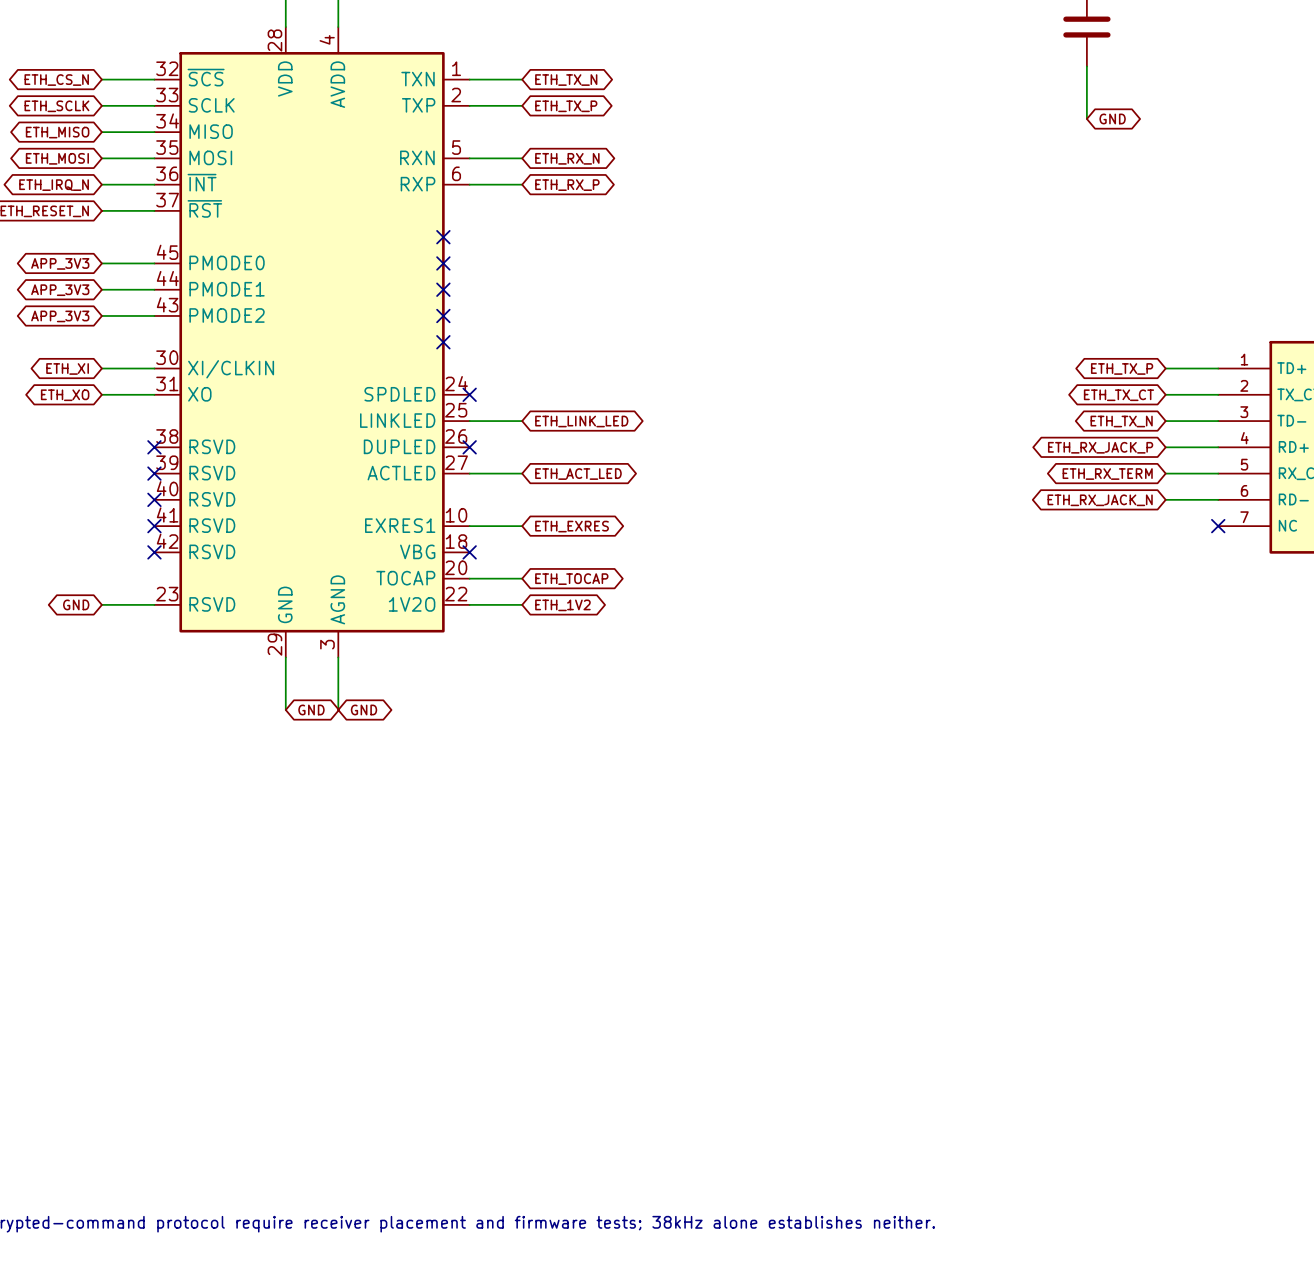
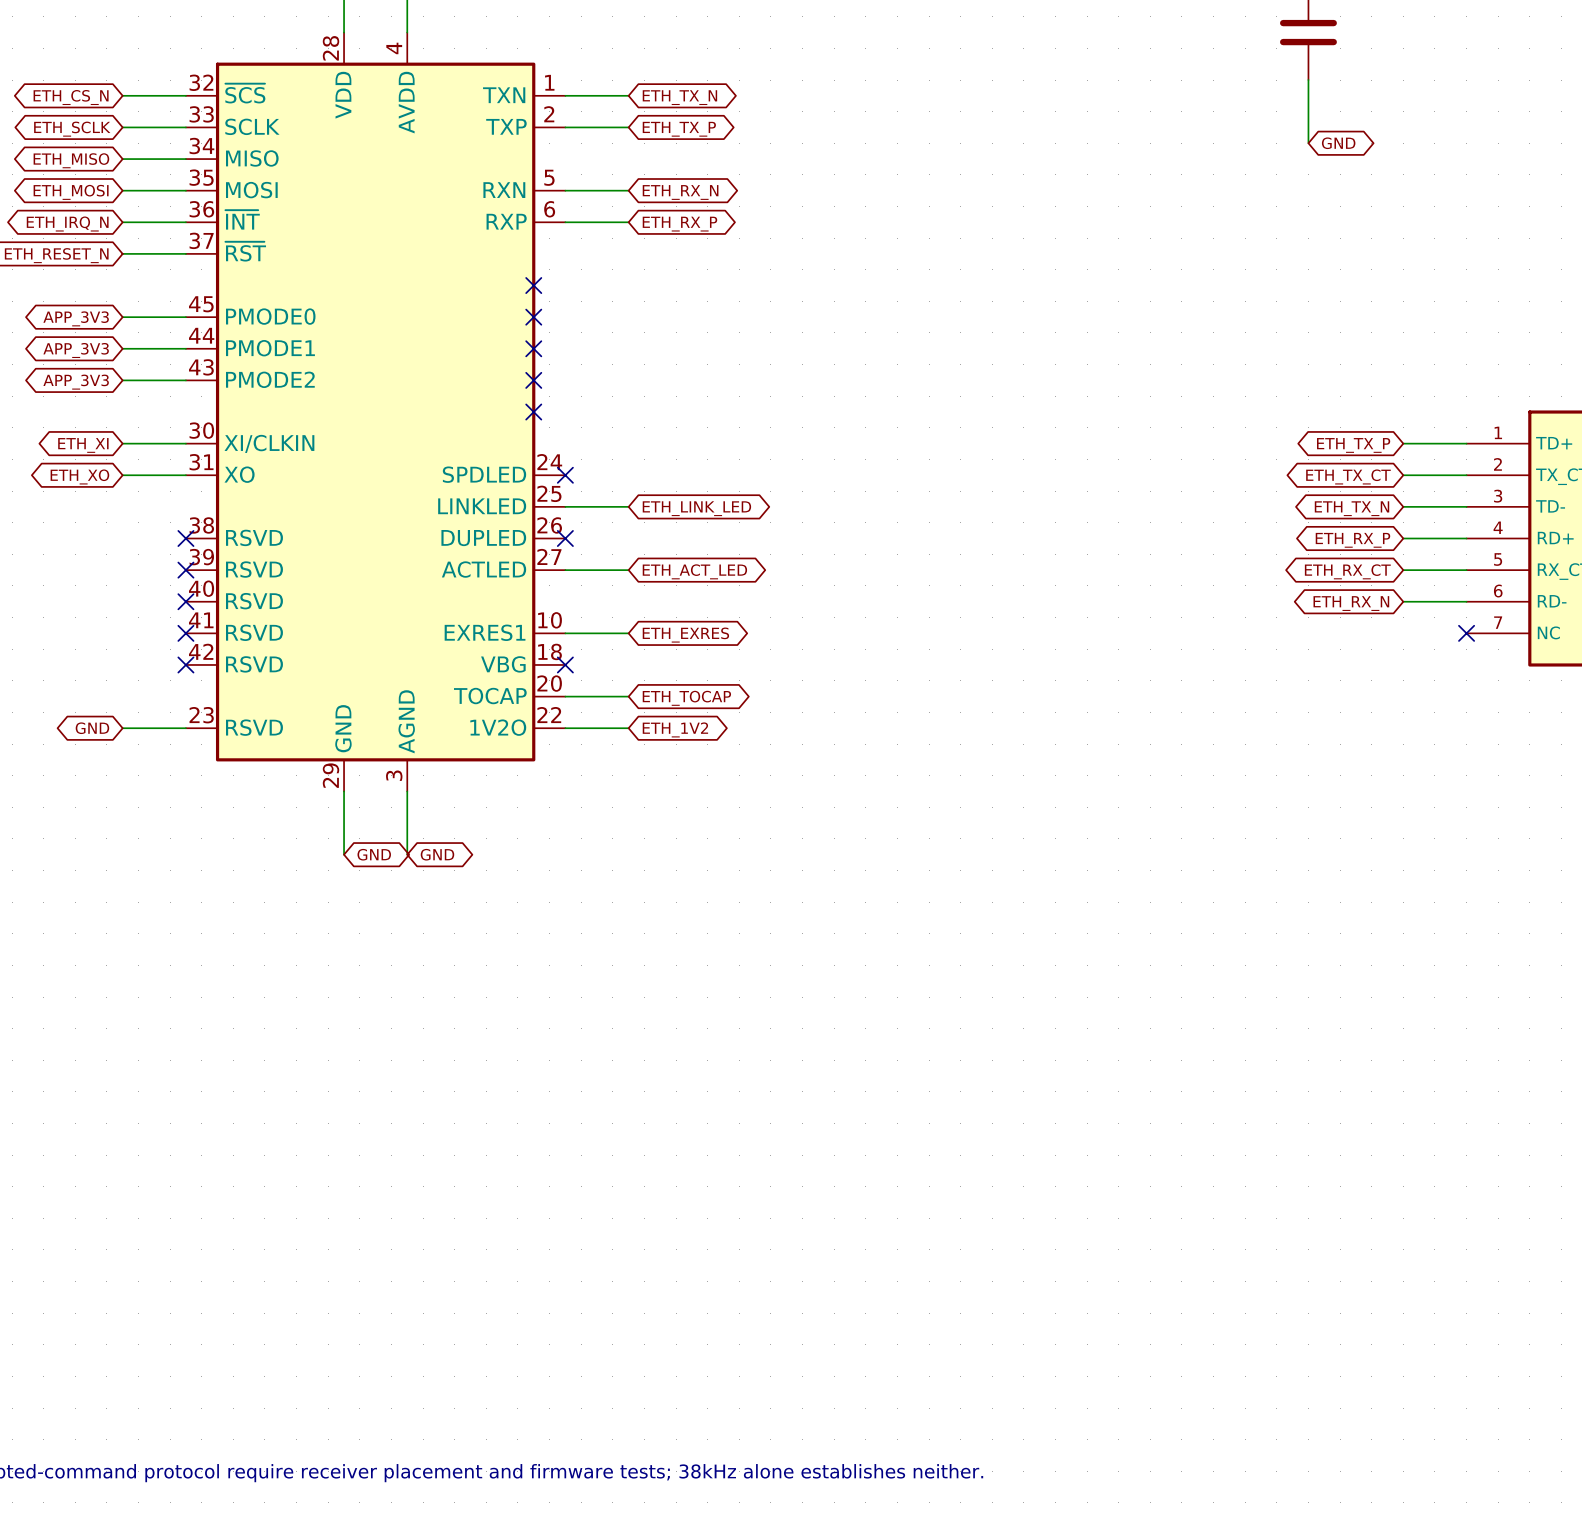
global label: ETH_RX_JACK_P (1100, 447) -> ETH_RX_P (1352, 540)
global label: ETH_RX_TERM (1107, 474) -> ETH_RX_CT (1347, 571)
global label: ETH_RX_JACK_N (1100, 500) -> ETH_RX_N (1351, 603)

